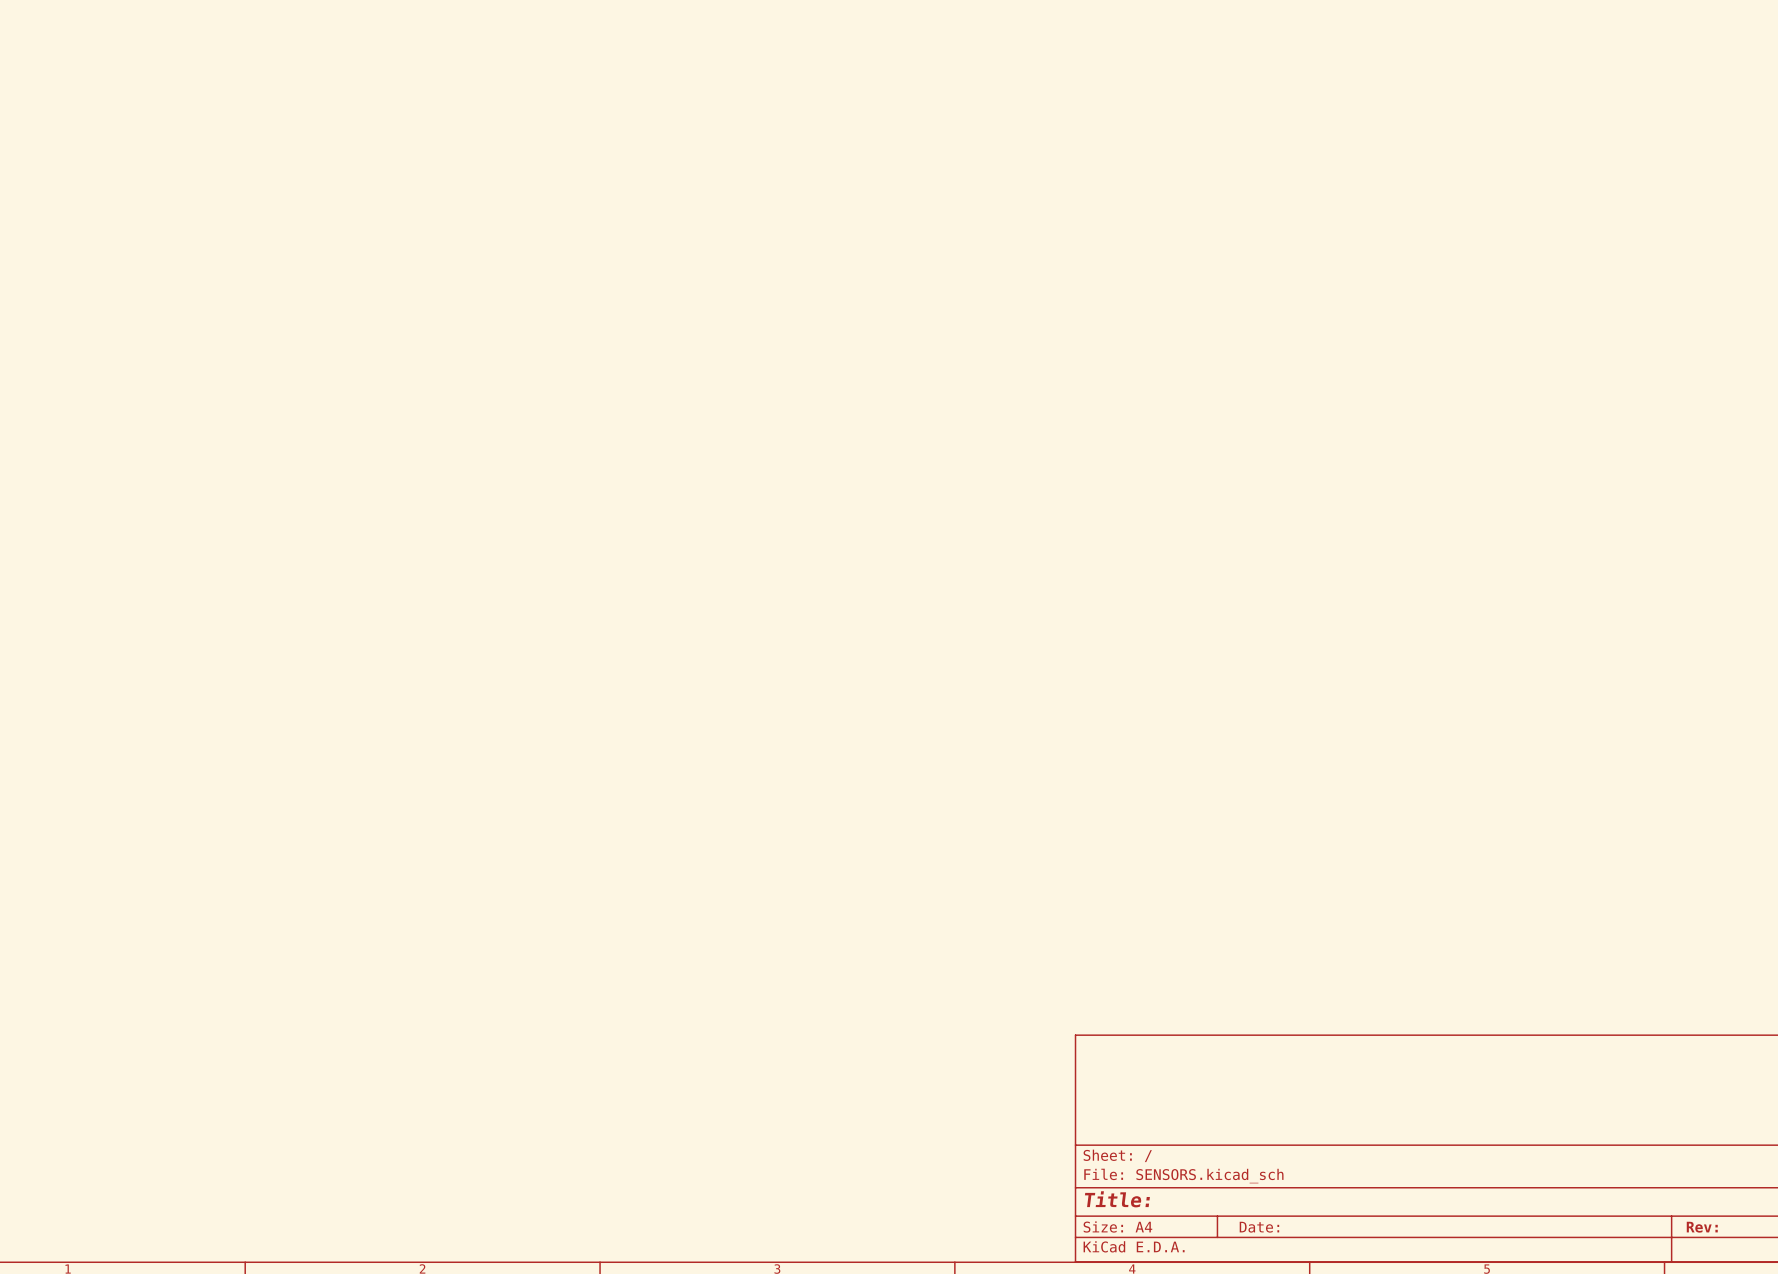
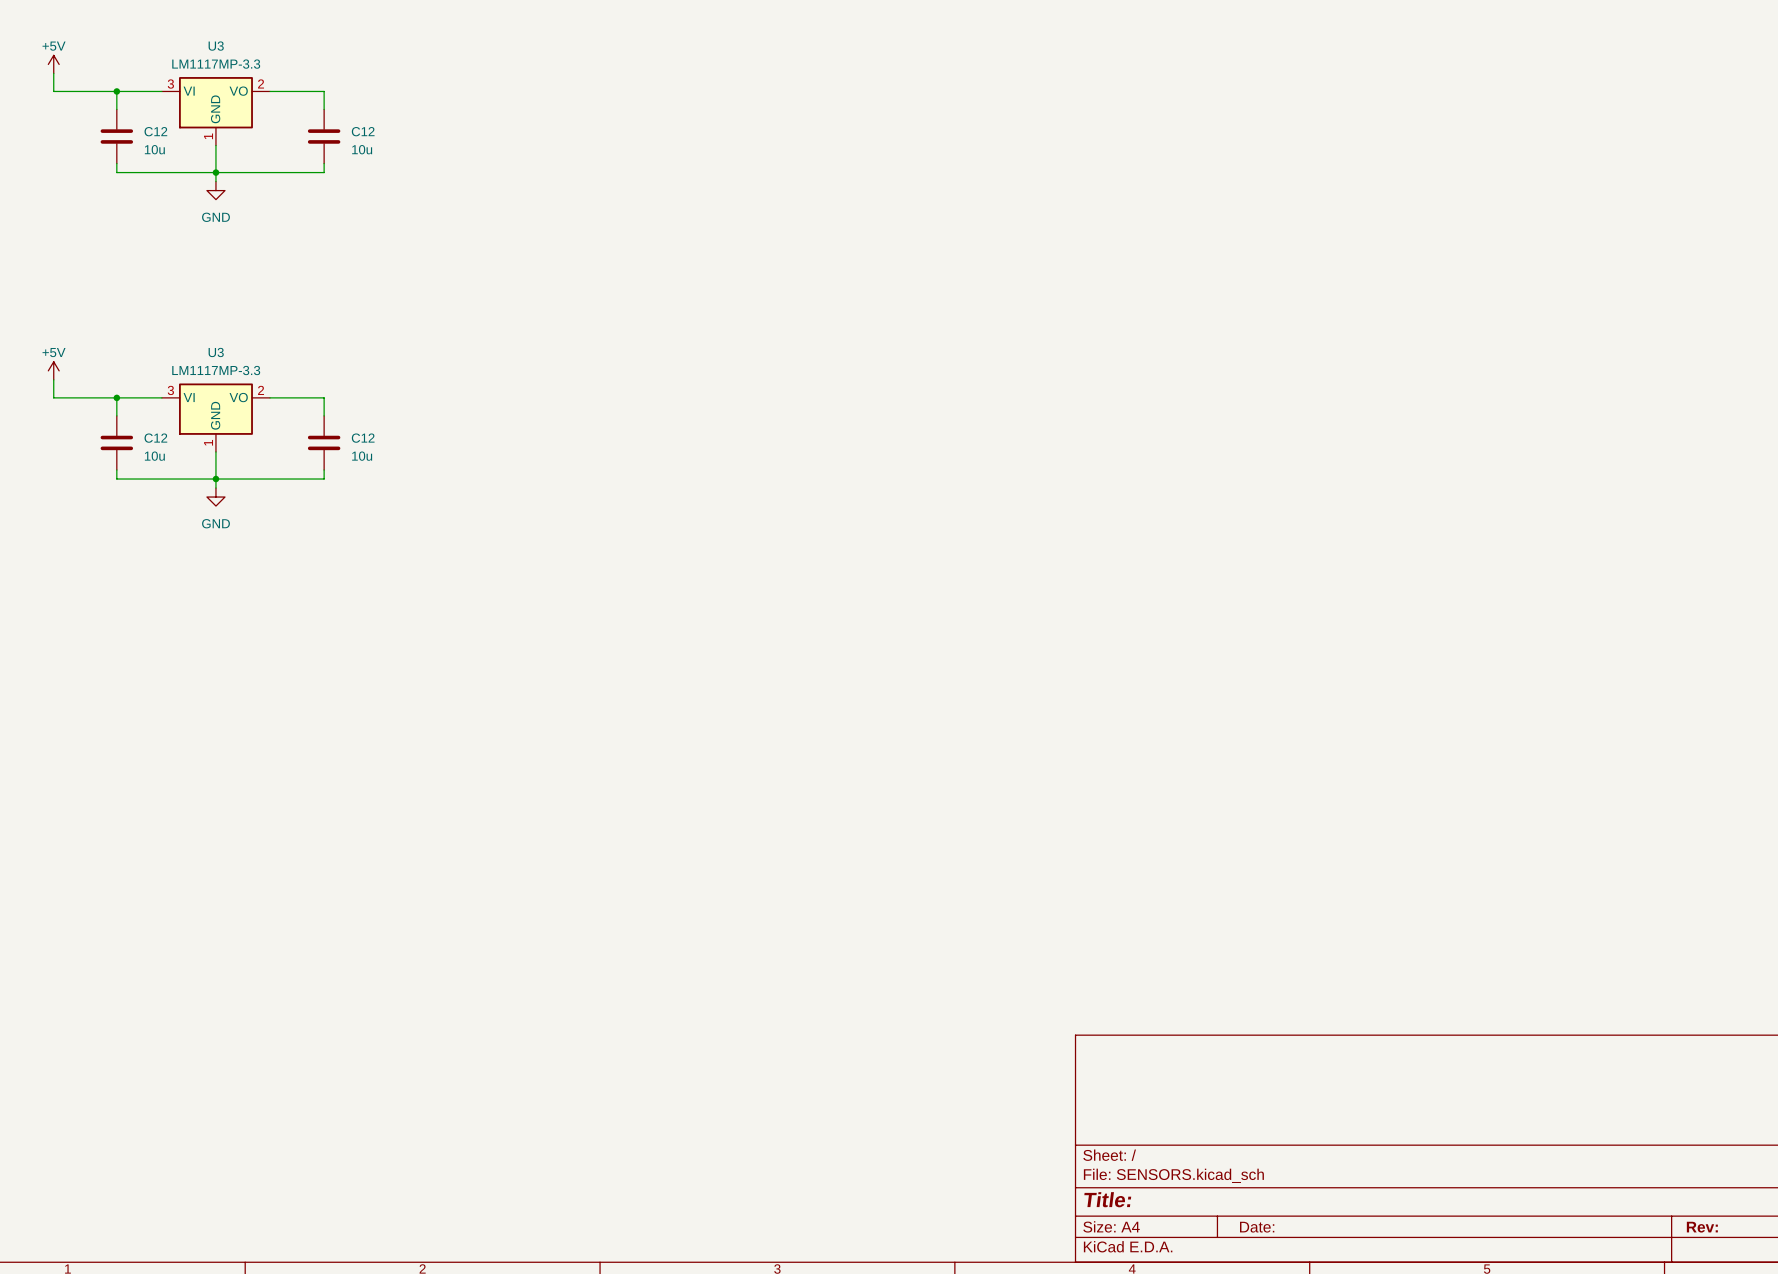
power symbol: none -> +5V (53, 64)
wire: none -> (53, 73) (53, 91) (161, 91)
wire: none -> (116, 91) (116, 109)
junction: none -> (116, 91)
wire: none -> (270, 91) (324, 91) (324, 109)
U3: none -> LM1117MP-3.3 (215, 111)
C12: none -> 10u (116, 136)
C12: none -> 10u (324, 136)
wire: none -> (215, 145) (215, 181)
wire: none -> (116, 163) (116, 172) (324, 172) (324, 163)
junction: none -> (215, 172)
power symbol: none -> GND (215, 190)
power symbol: none -> +5V (53, 370)
wire: none -> (53, 379) (53, 397) (161, 397)
wire: none -> (116, 397) (116, 415)
junction: none -> (116, 397)
wire: none -> (270, 397) (324, 397) (324, 415)
U3: none -> LM1117MP-3.3 (215, 417)
C12: none -> 10u (116, 442)
C12: none -> 10u (324, 442)
wire: none -> (215, 451) (215, 488)
wire: none -> (116, 469) (116, 479) (324, 479) (324, 469)
junction: none -> (215, 479)
power symbol: none -> GND (215, 497)

